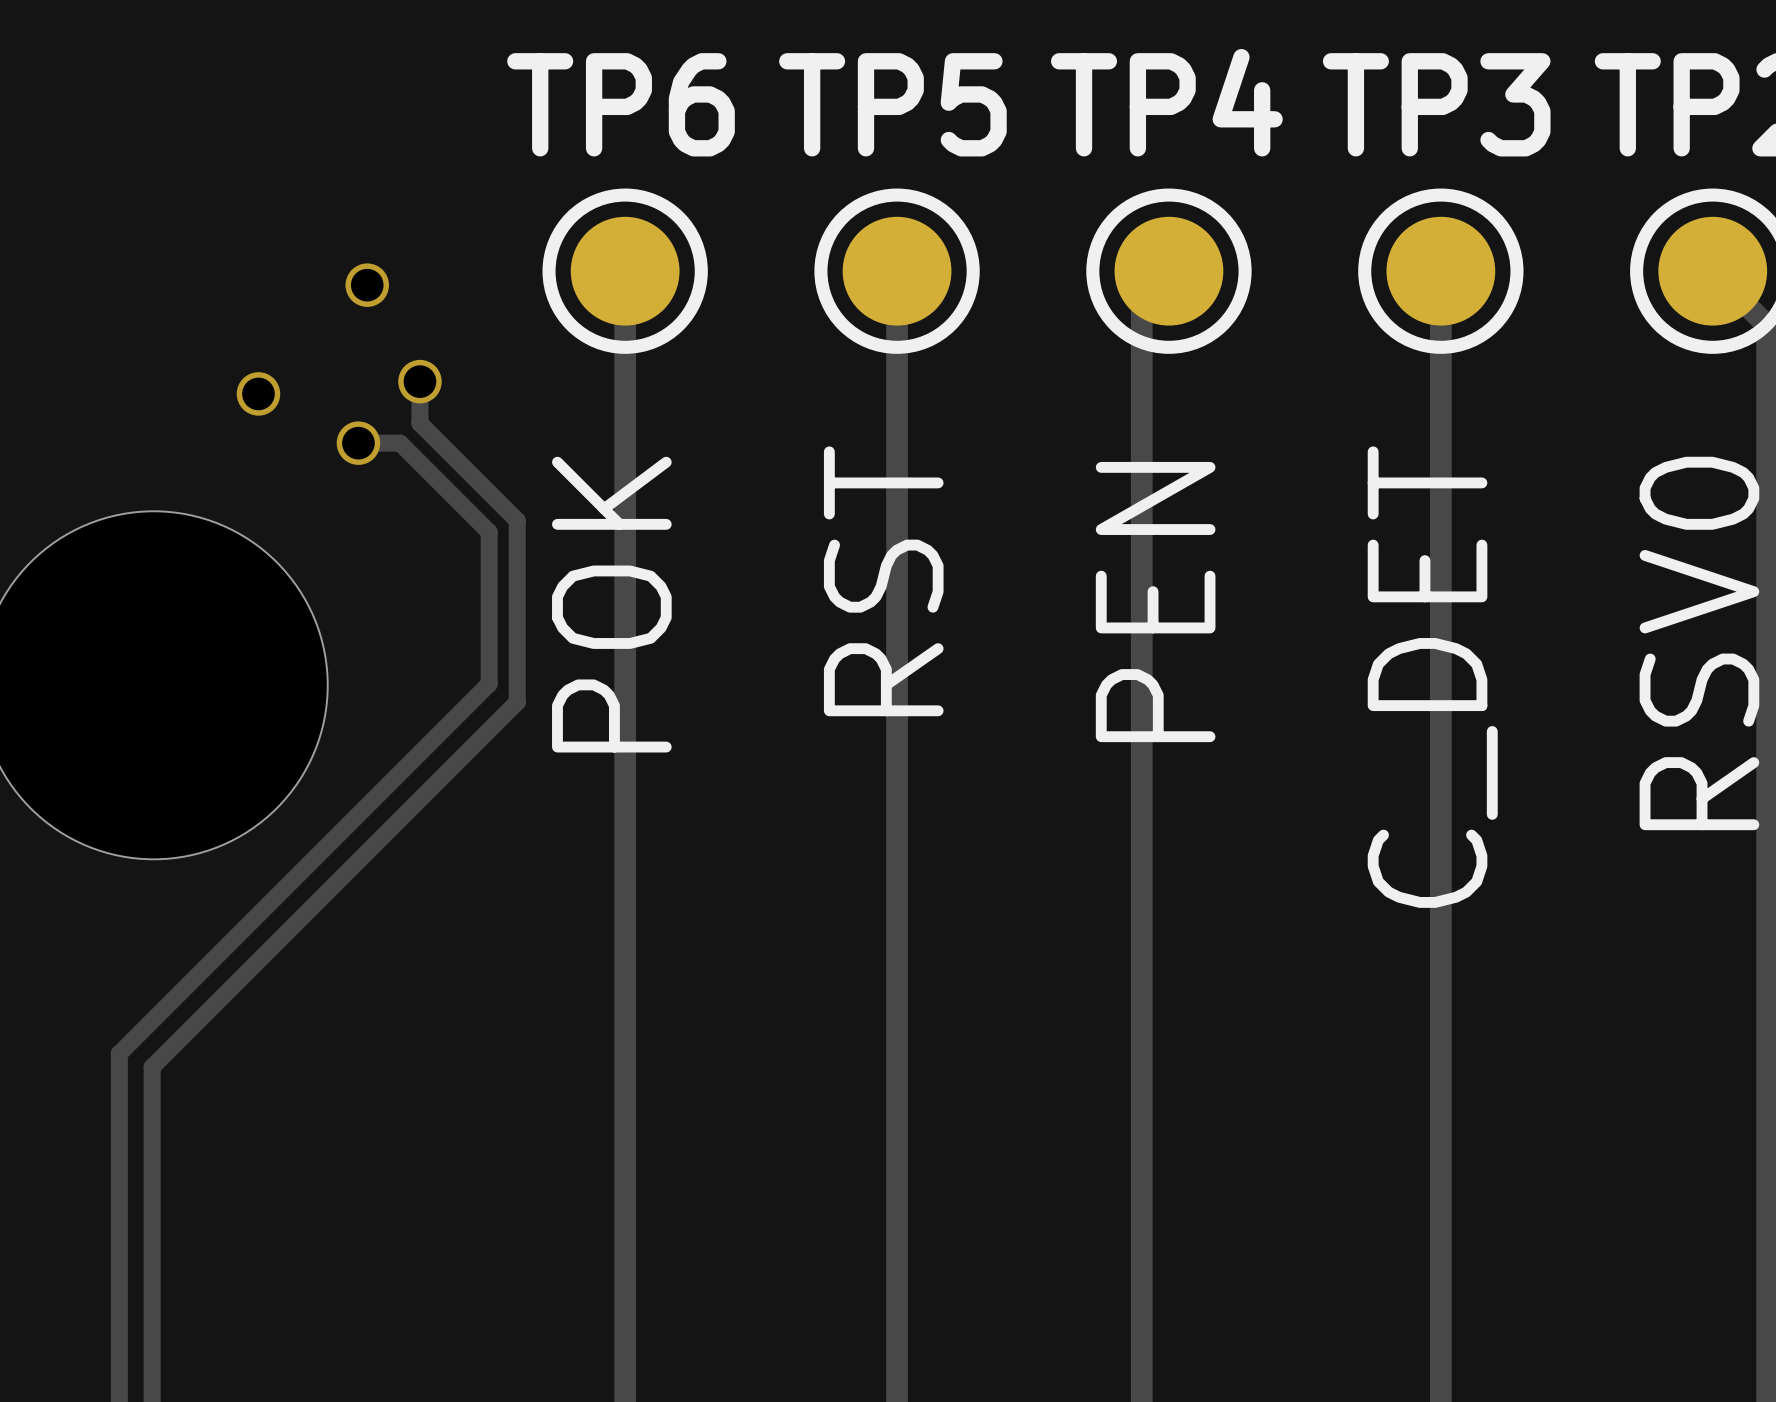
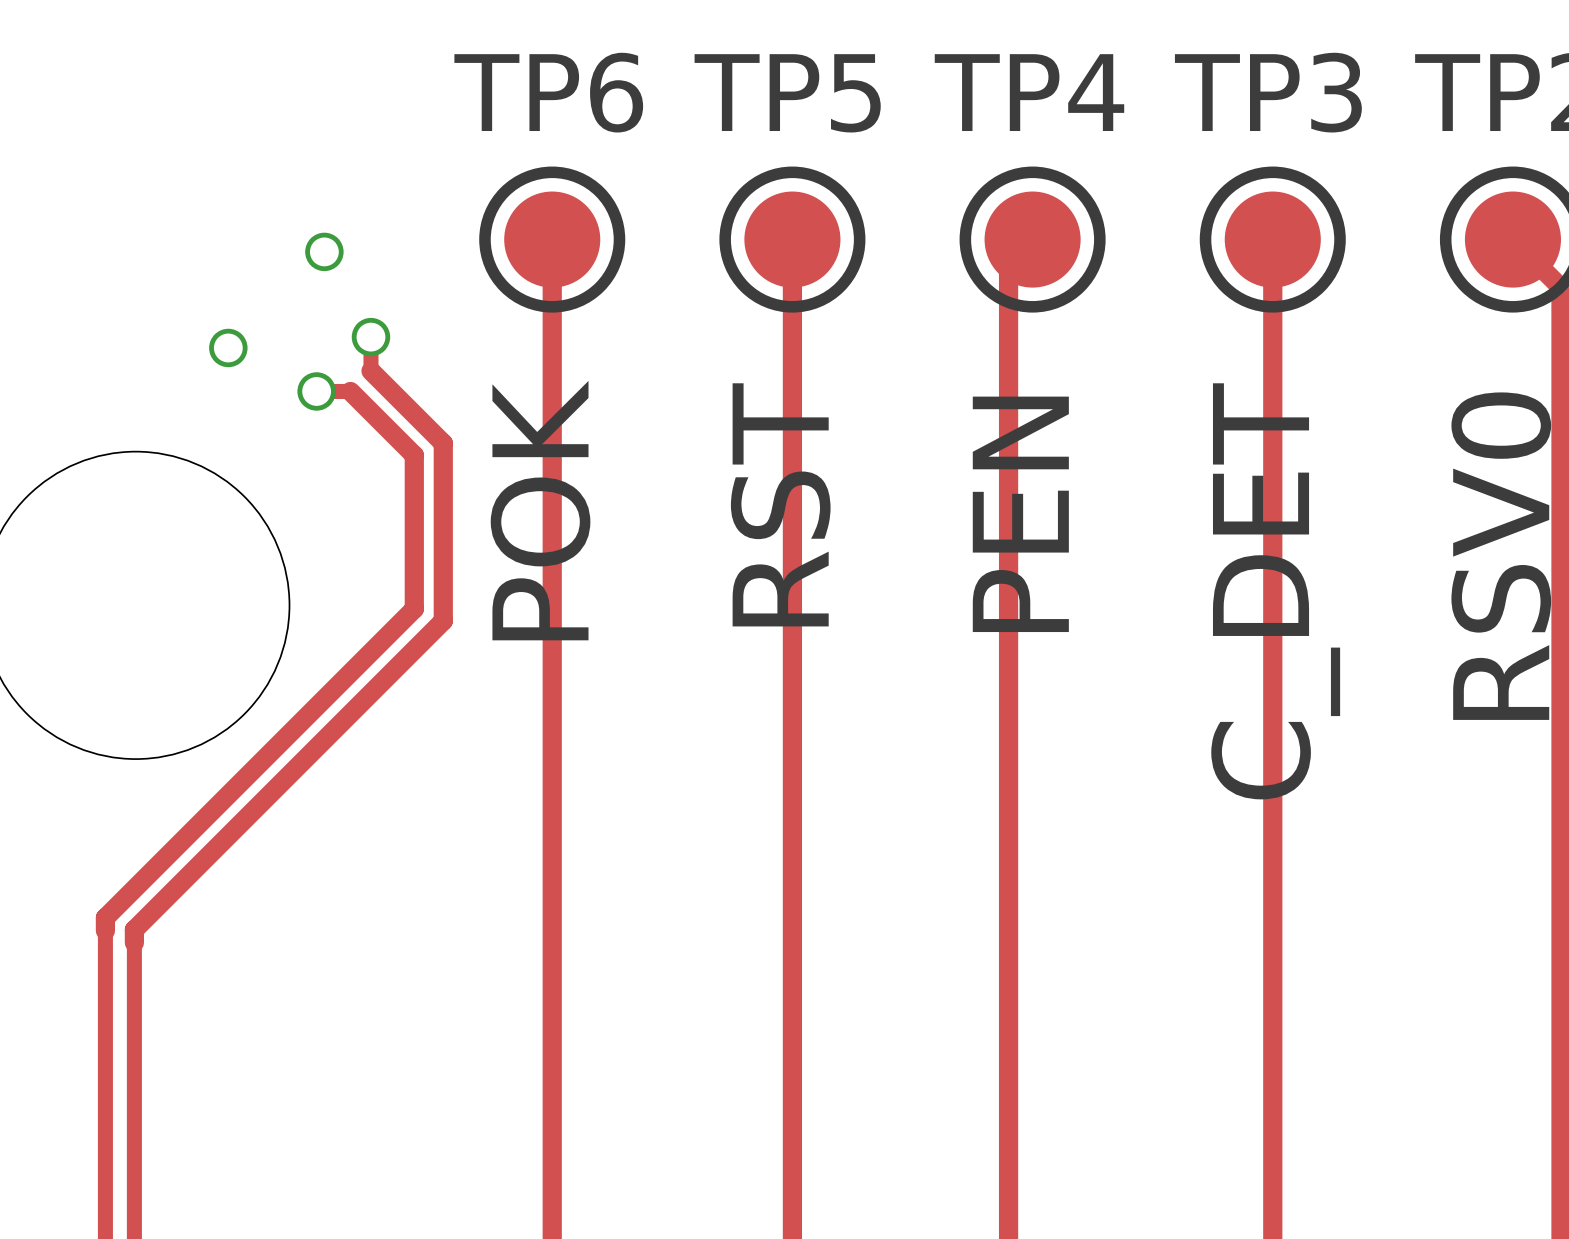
track: (419, 419) (419, 423) (517, 520) (517, 702) (152, 1067) -> (370, 370) (443, 443) (443, 620) (134, 929) (134, 942)
track: (396, 443) (400, 443) (489, 532) (489, 683) (119, 1053) -> (350, 391) (414, 455) (414, 608) (105, 917) (105, 930)

